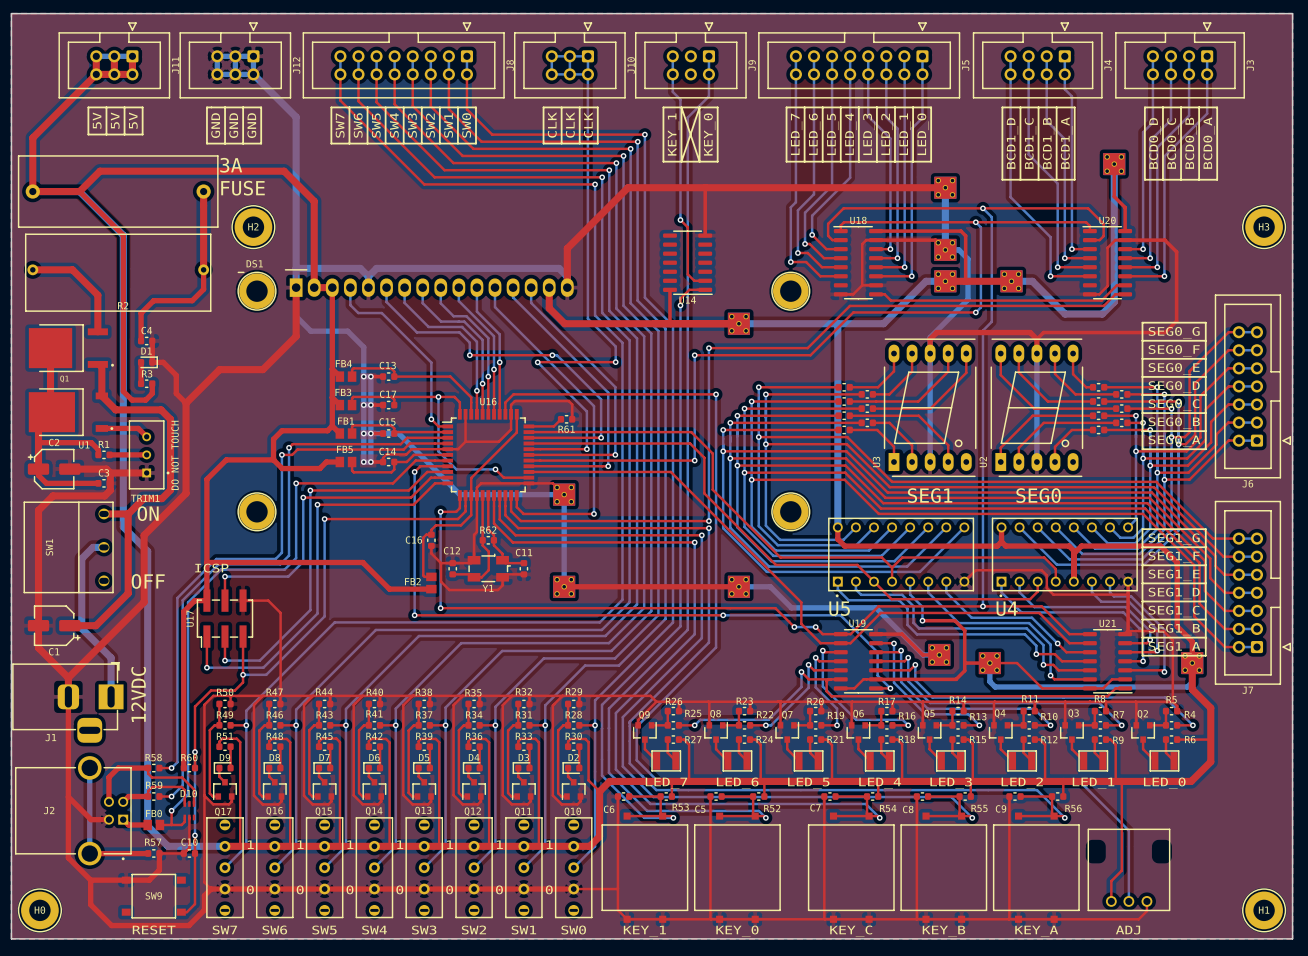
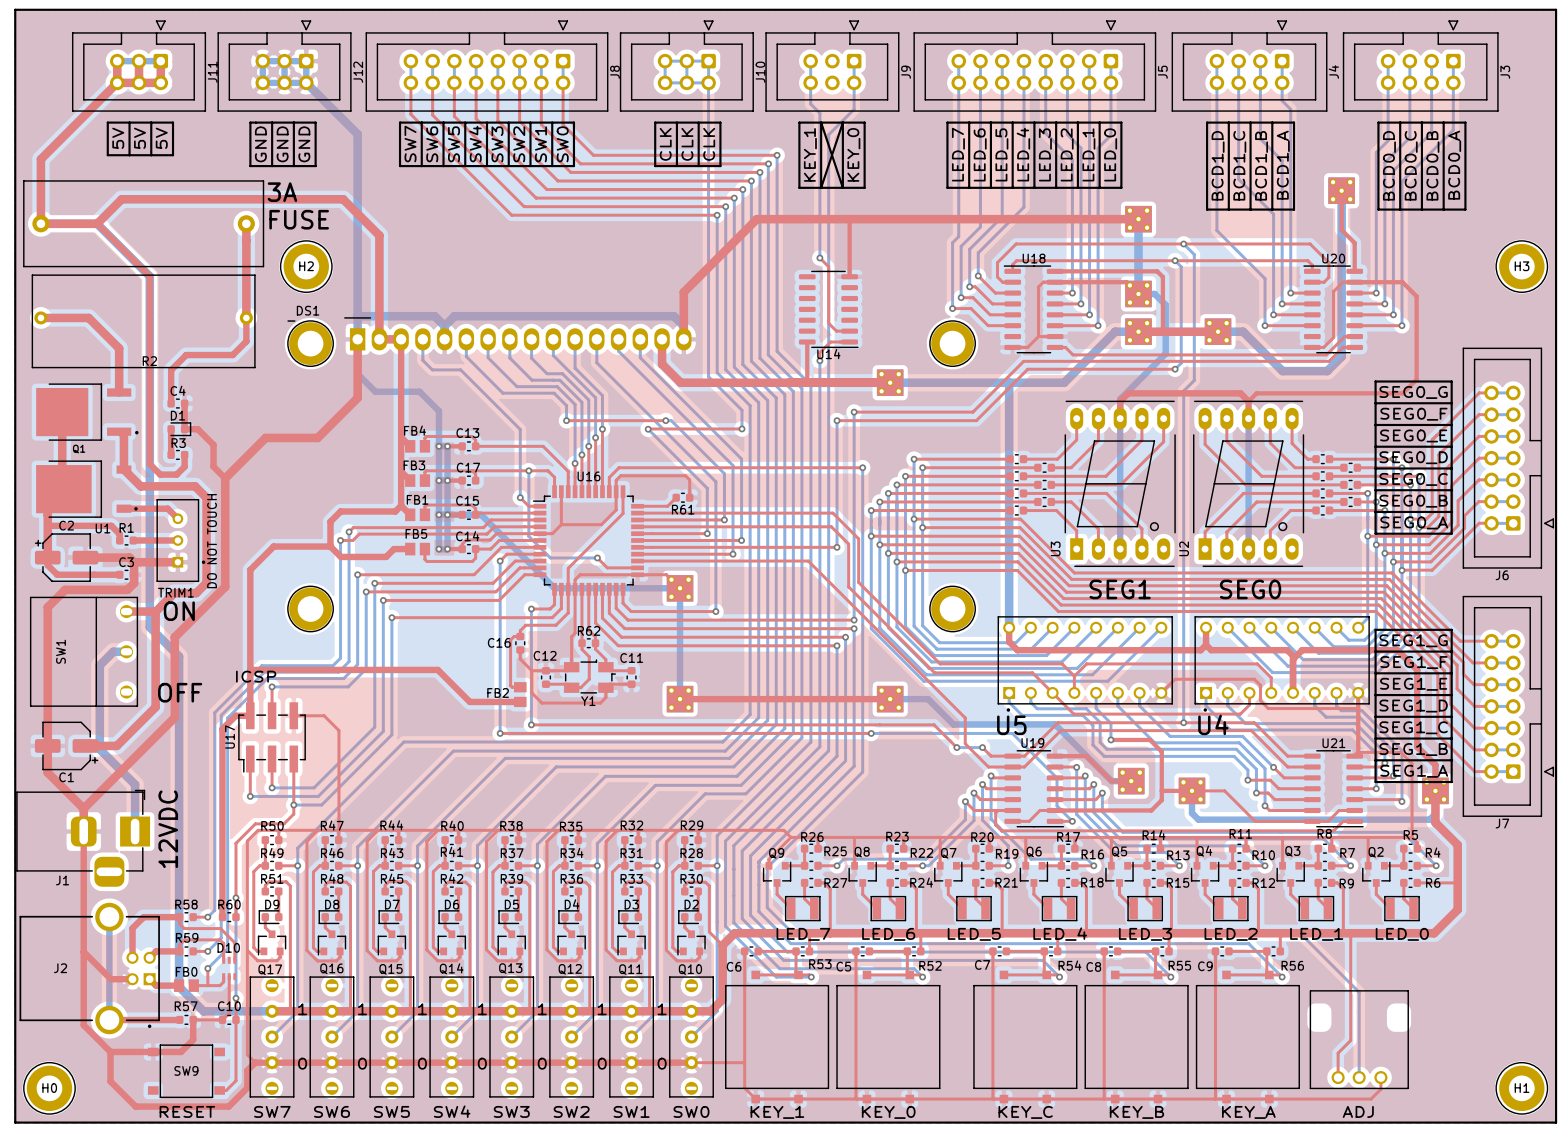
board edge: (11, 13) (1292, 13) (1292, 938) (11, 938) (11, 13) -> none
line: none -> (15, 9) (15, 1122) (1556, 1122) (1556, 9) (15, 9)

